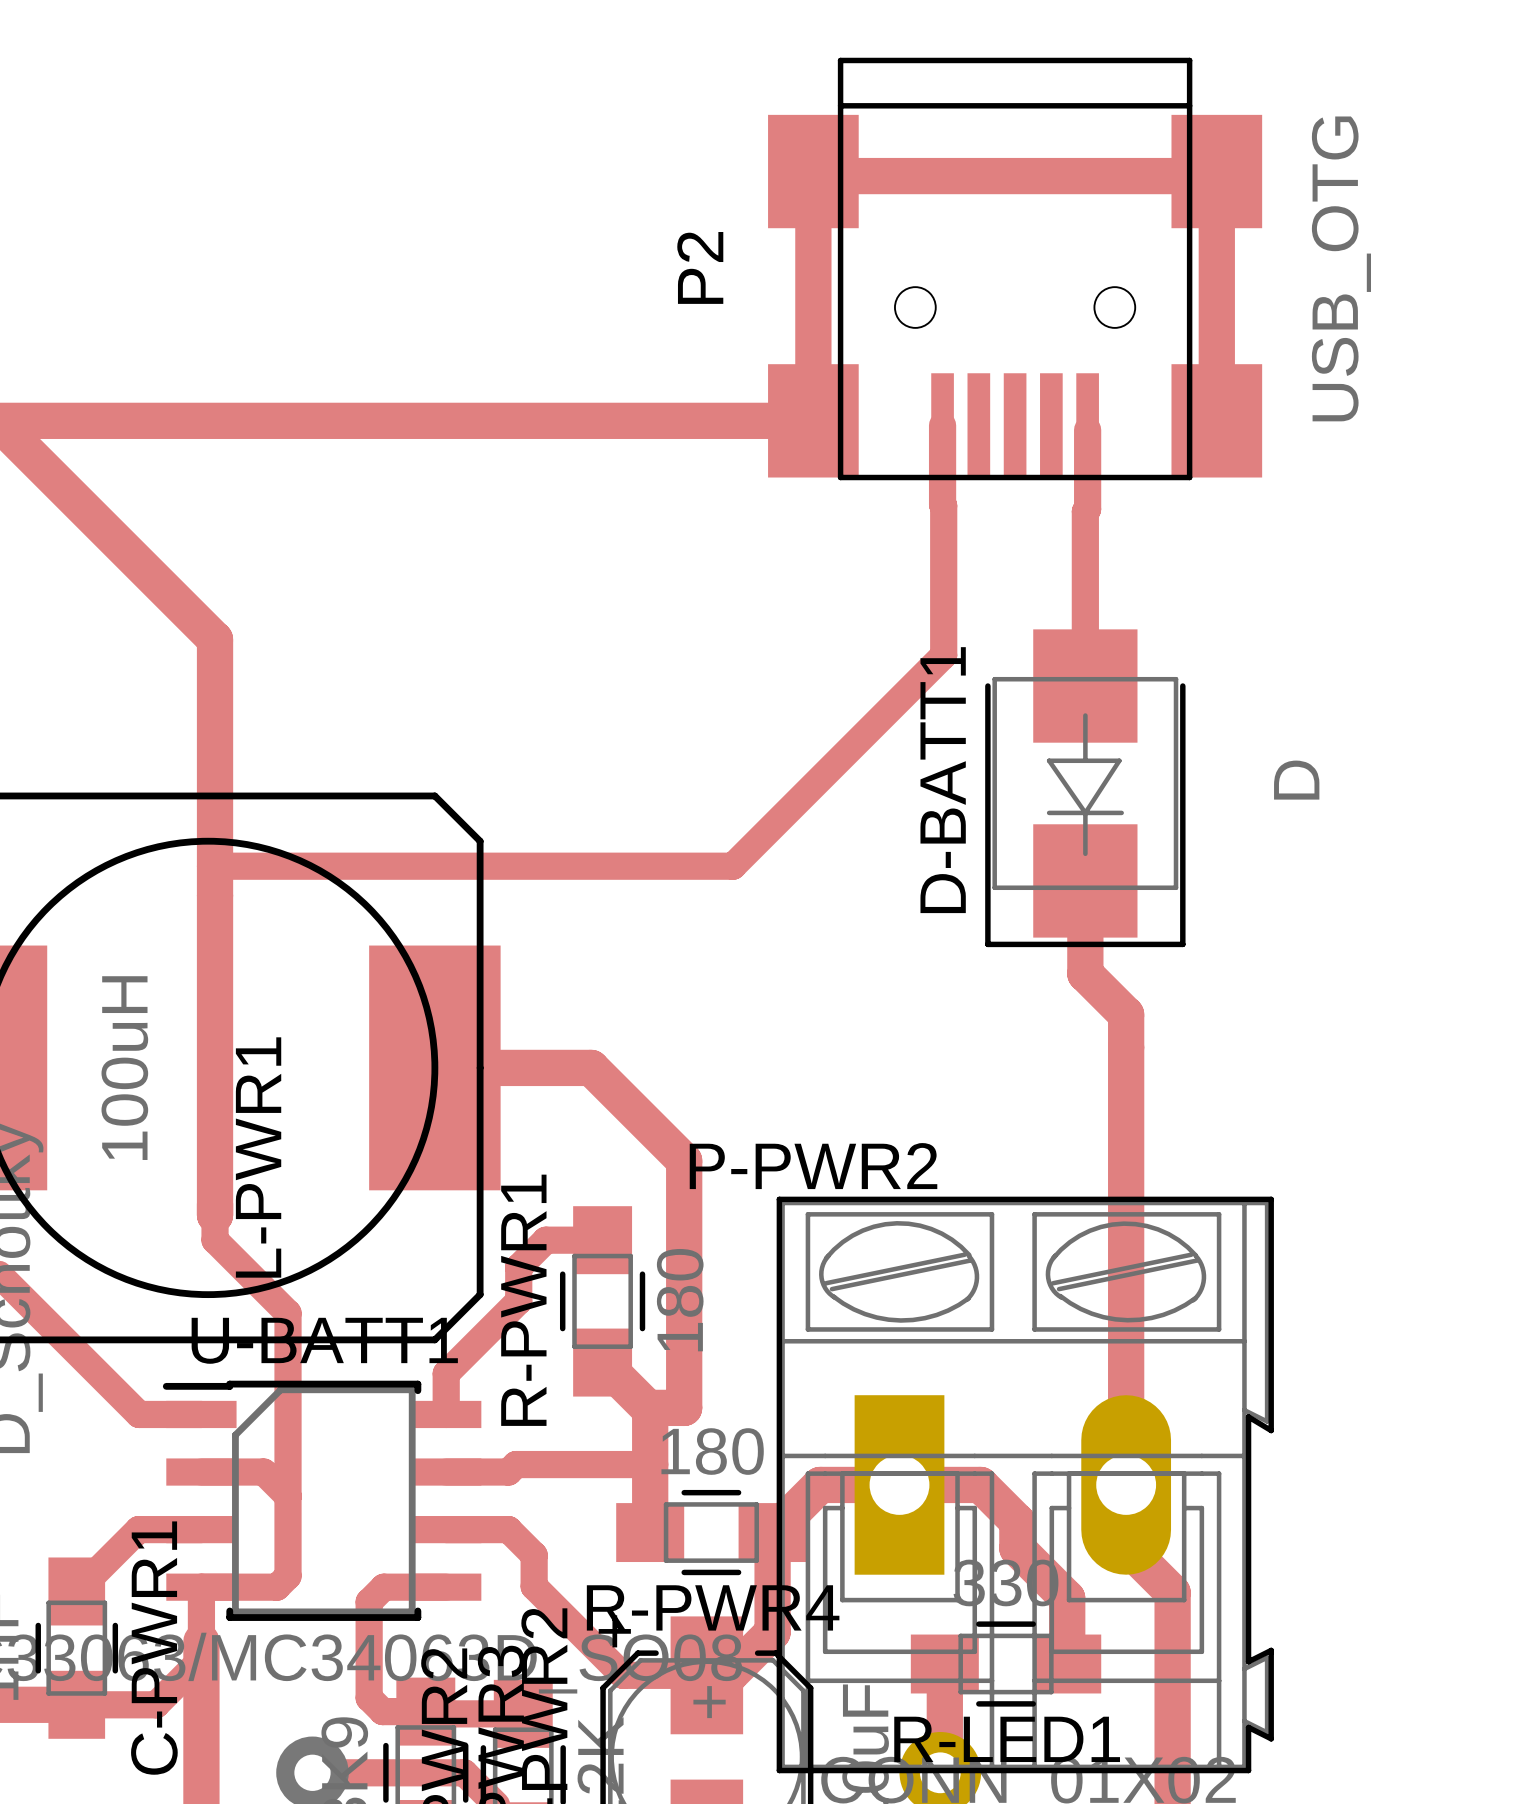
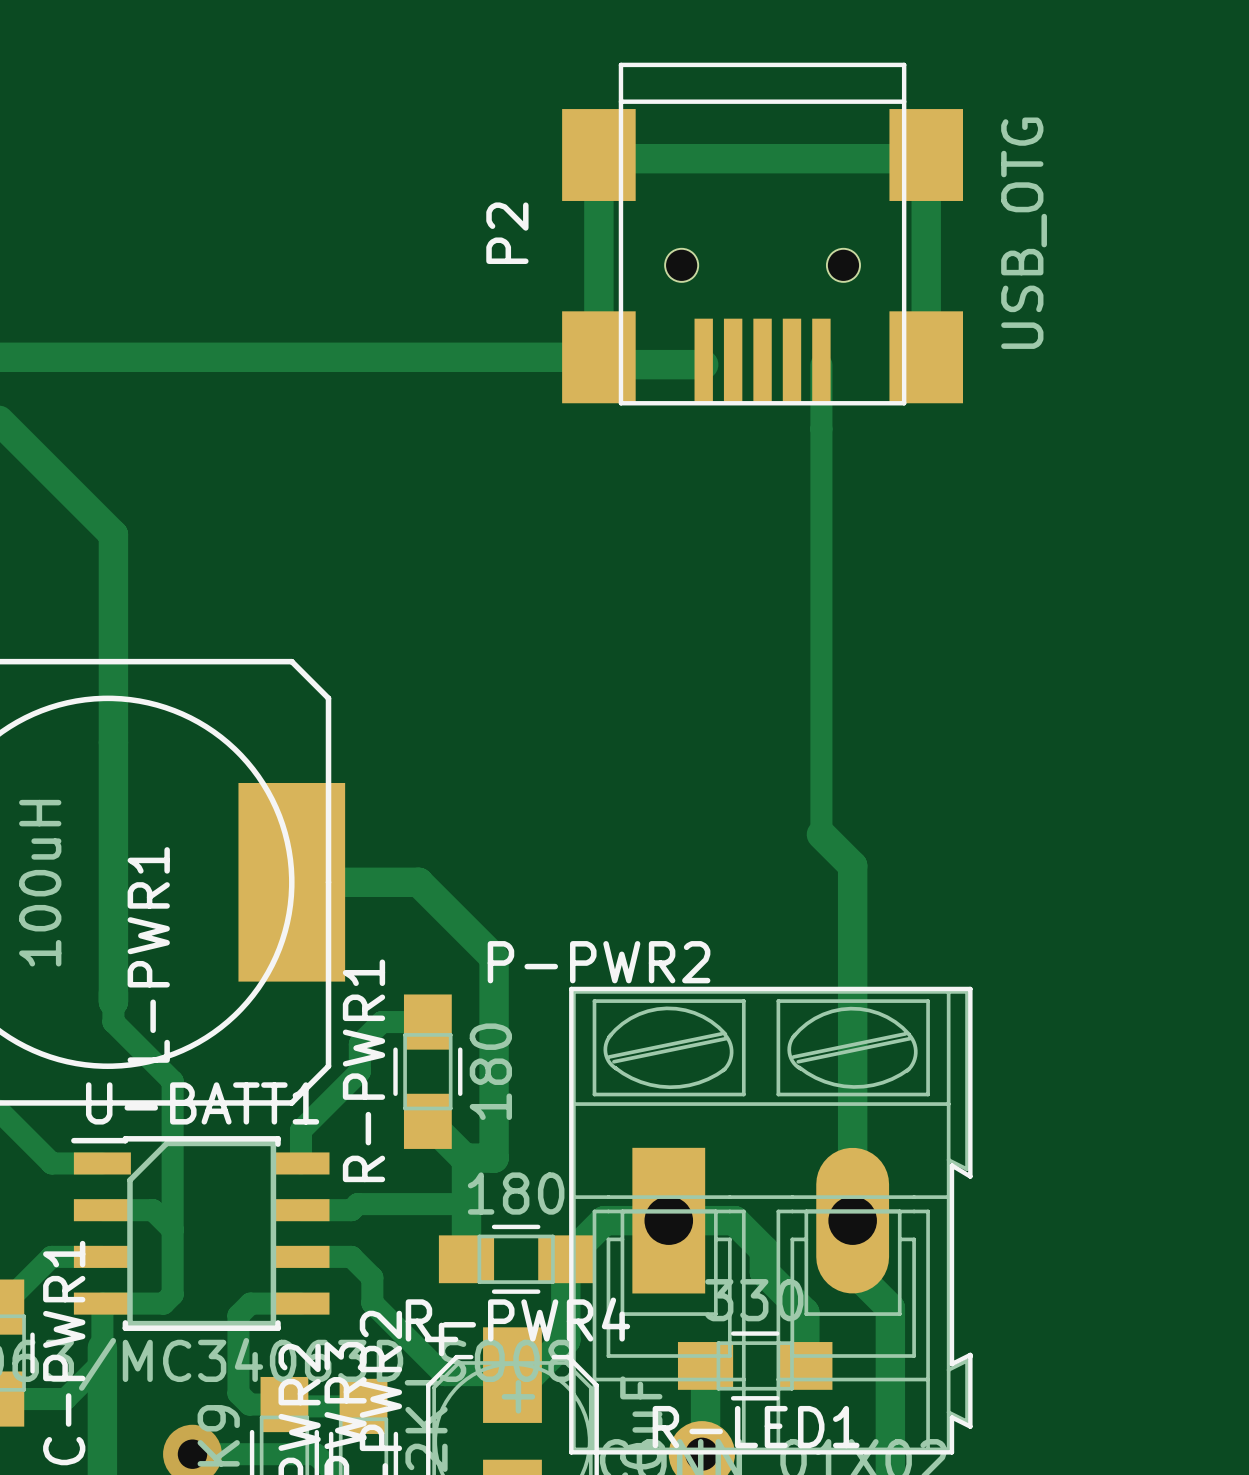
track: (942, 425) (943, 655) (732, 866) (215, 866) -> none
track: none -> (602, 364) (703, 364)
track: (1087, 509) (1085, 511) (1085, 686) -> (821, 429) (821, 834) (852, 865)
D-BATT1: D (1085, 788) -> none
track: (1085, 880) (1085, 973) (1126, 1014) (1126, 1047) -> none

